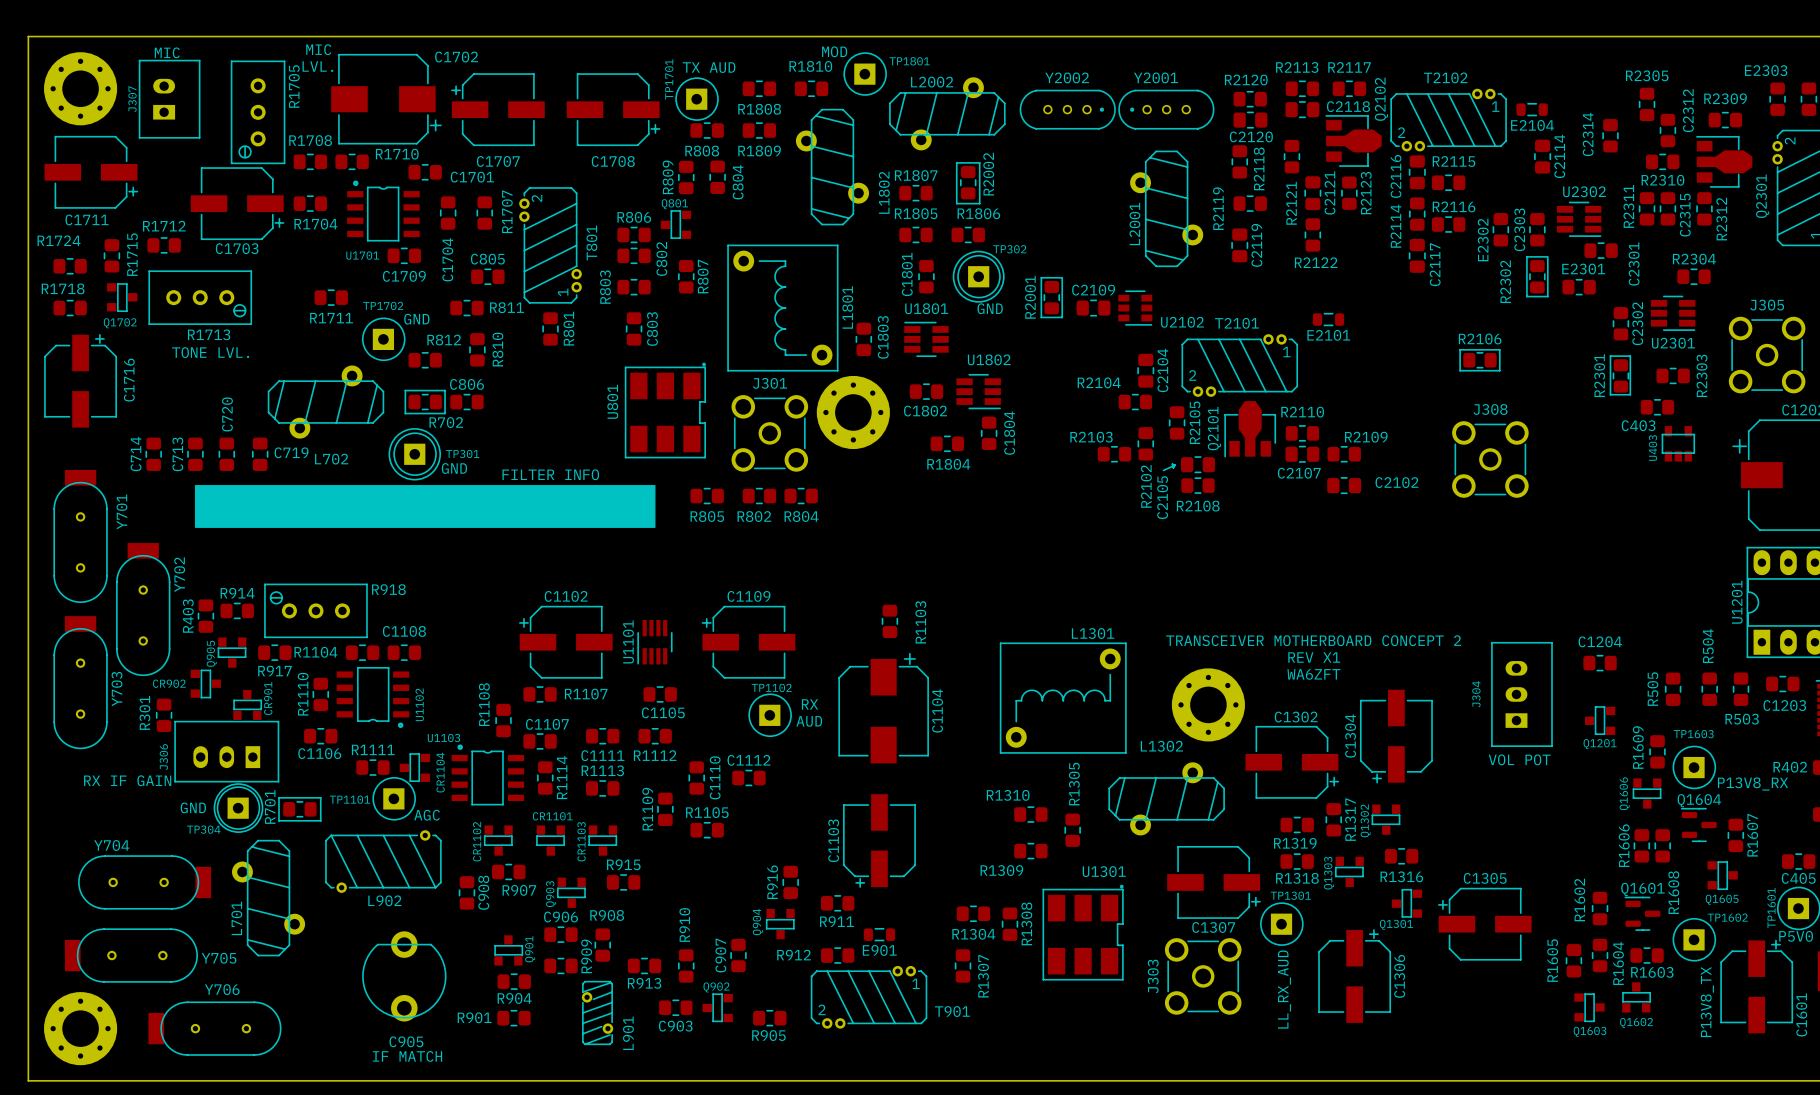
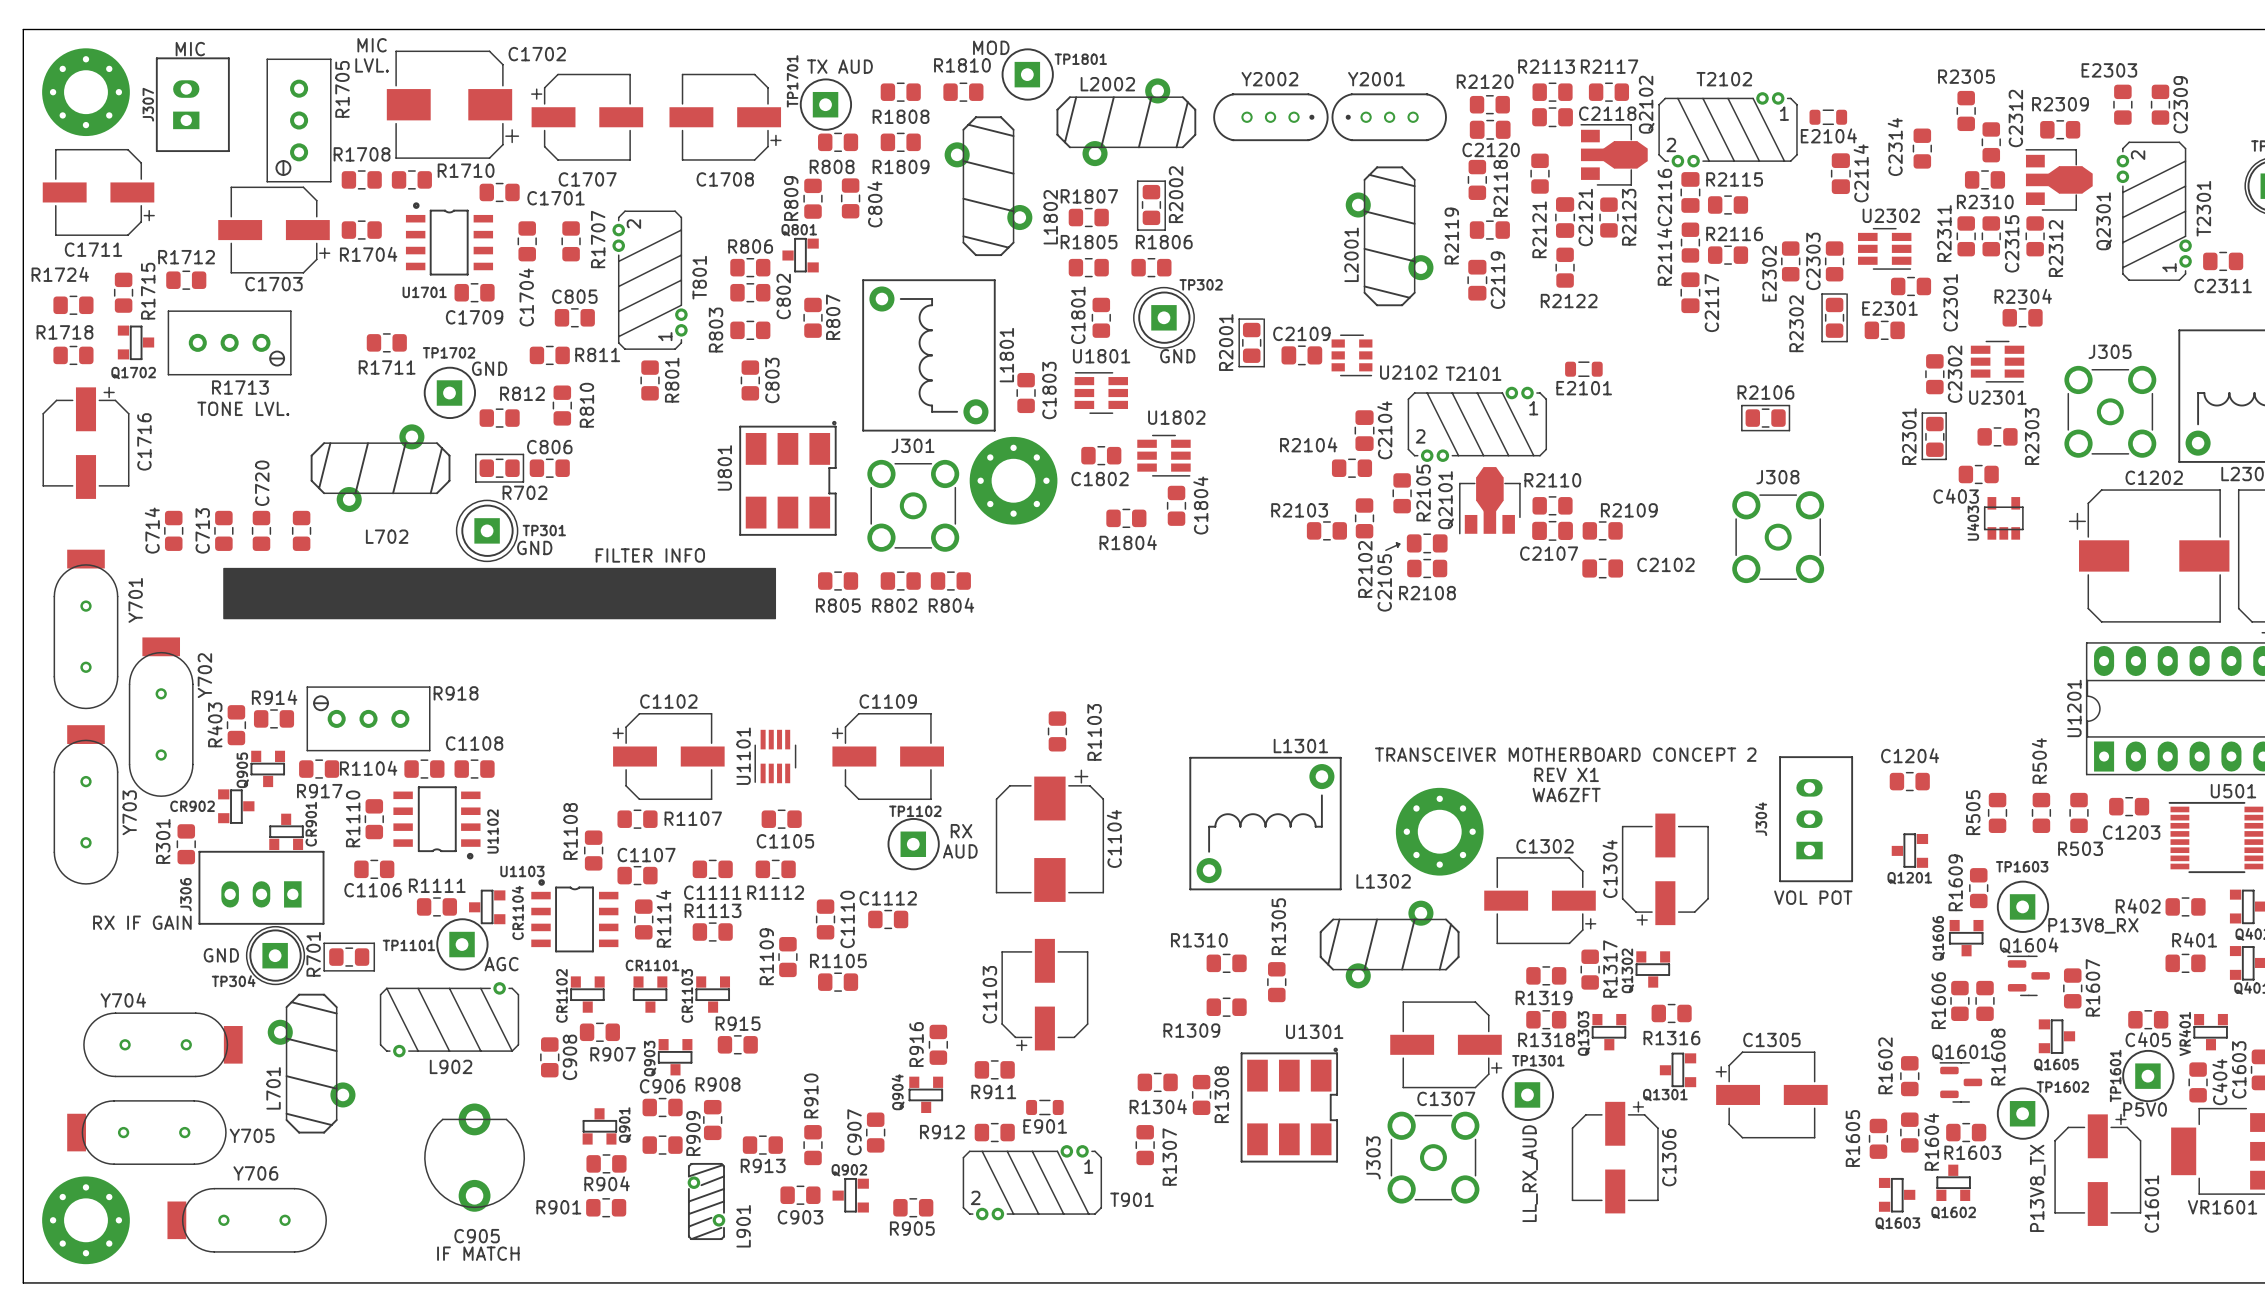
C719 name: C719 (291, 452) -> none

